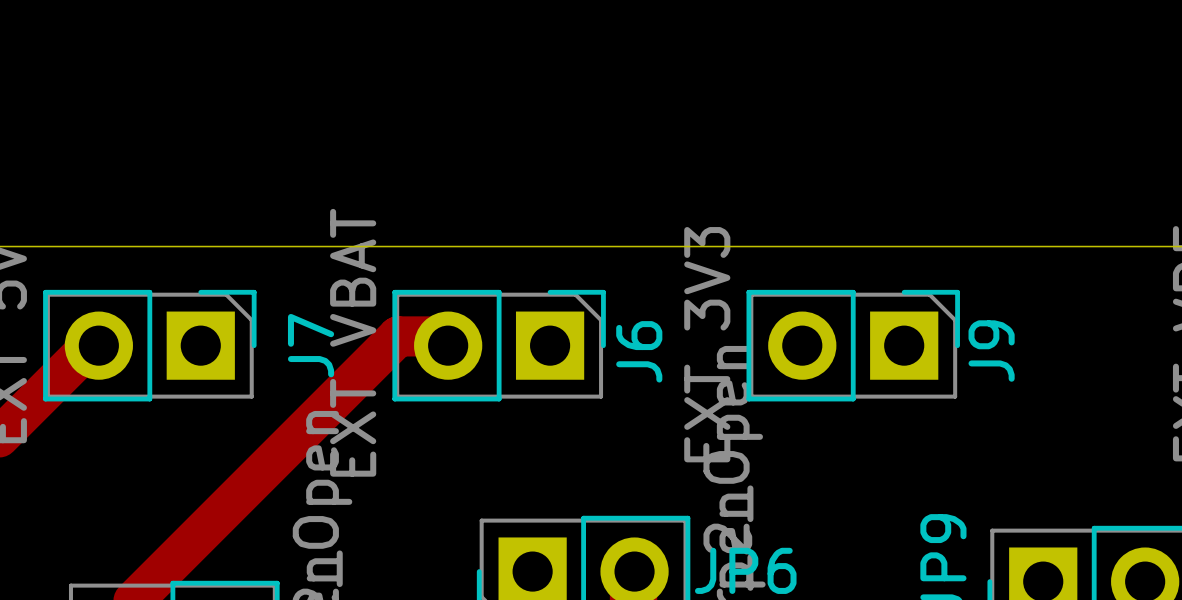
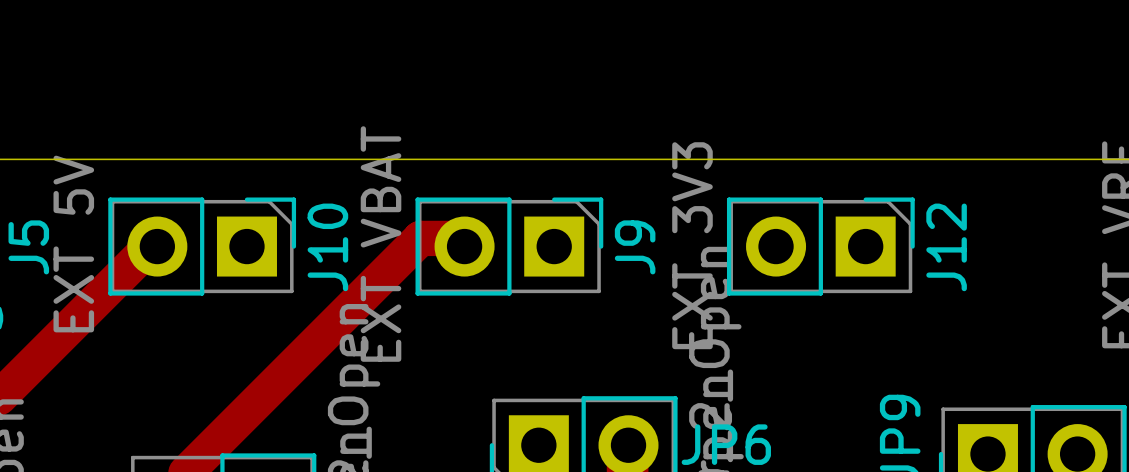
J7 name: J7 (311, 345) -> J10 (327, 247)
J6 name: J6 (639, 351) -> J9 (635, 247)
J9 name: J9 (991, 351) -> J12 (946, 247)

